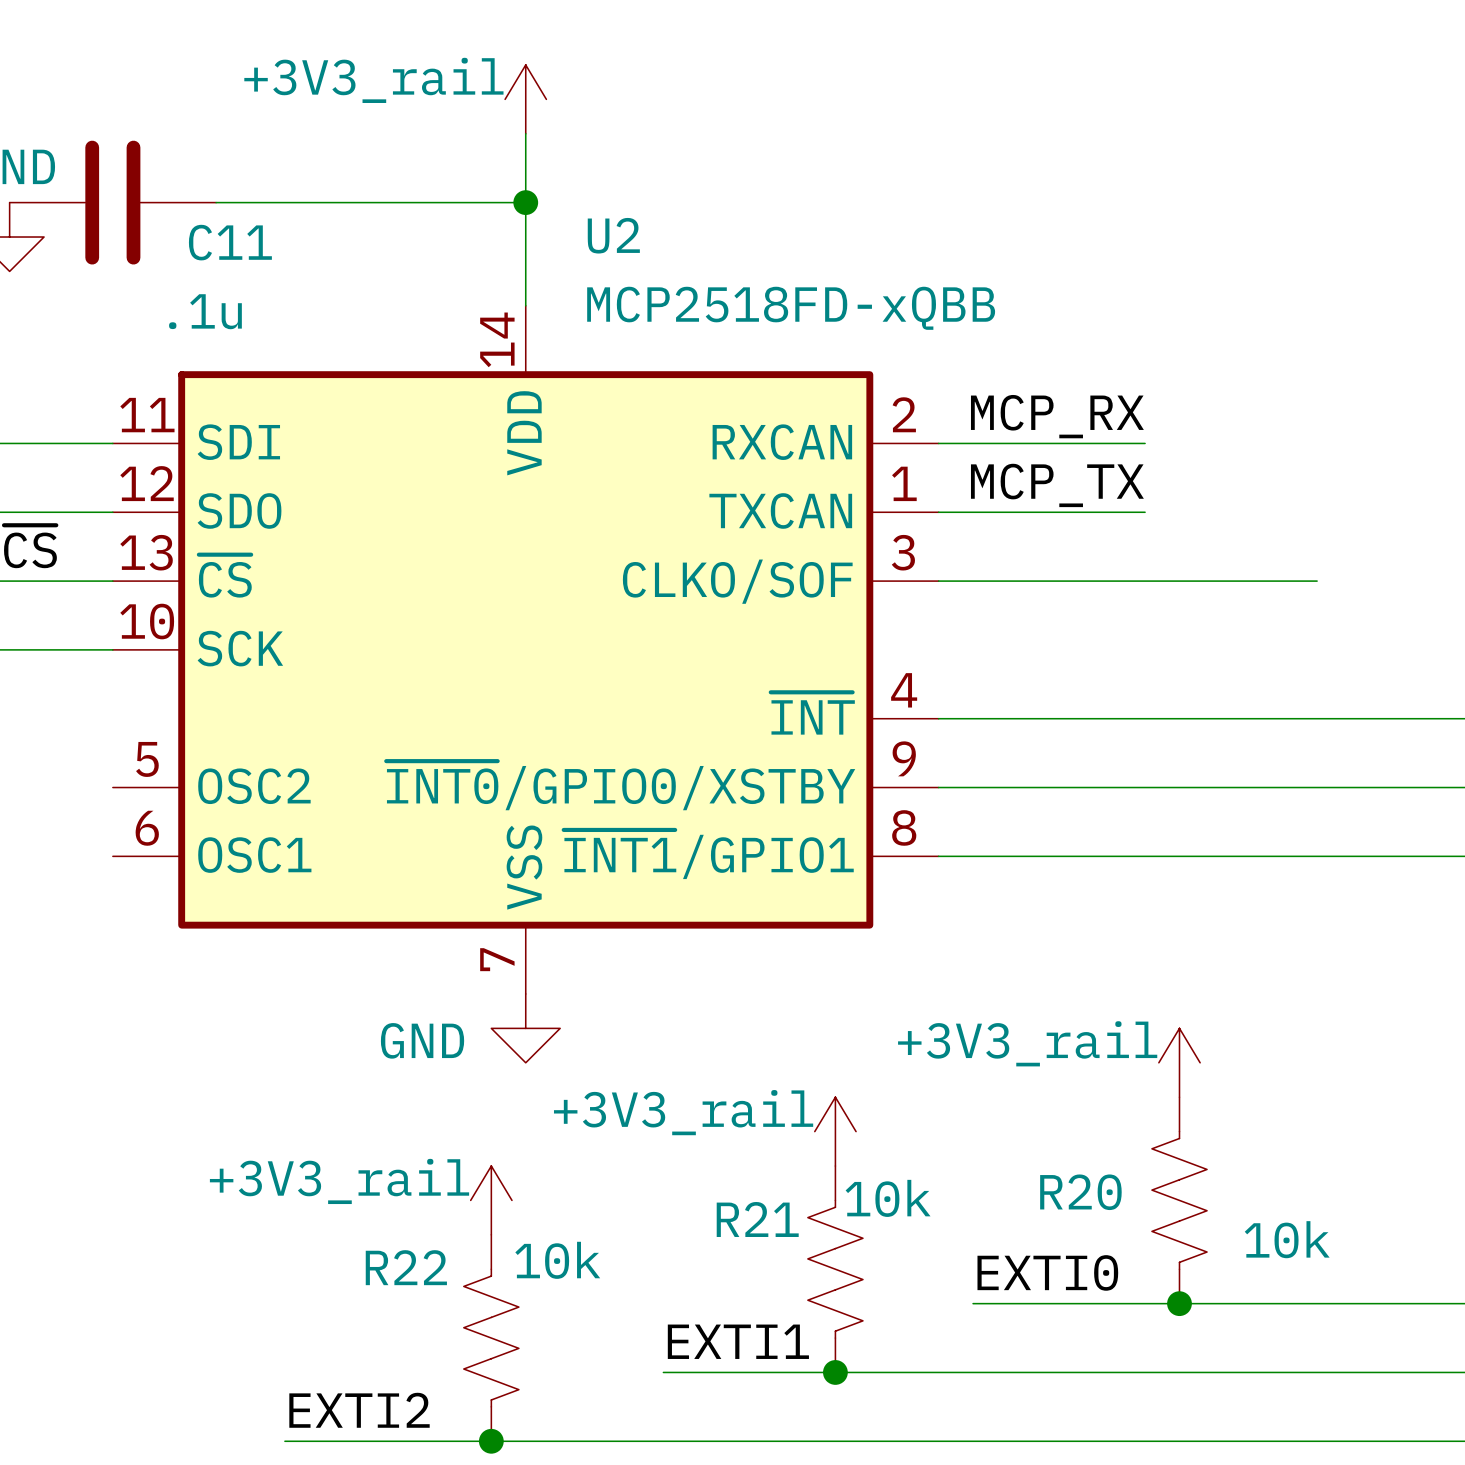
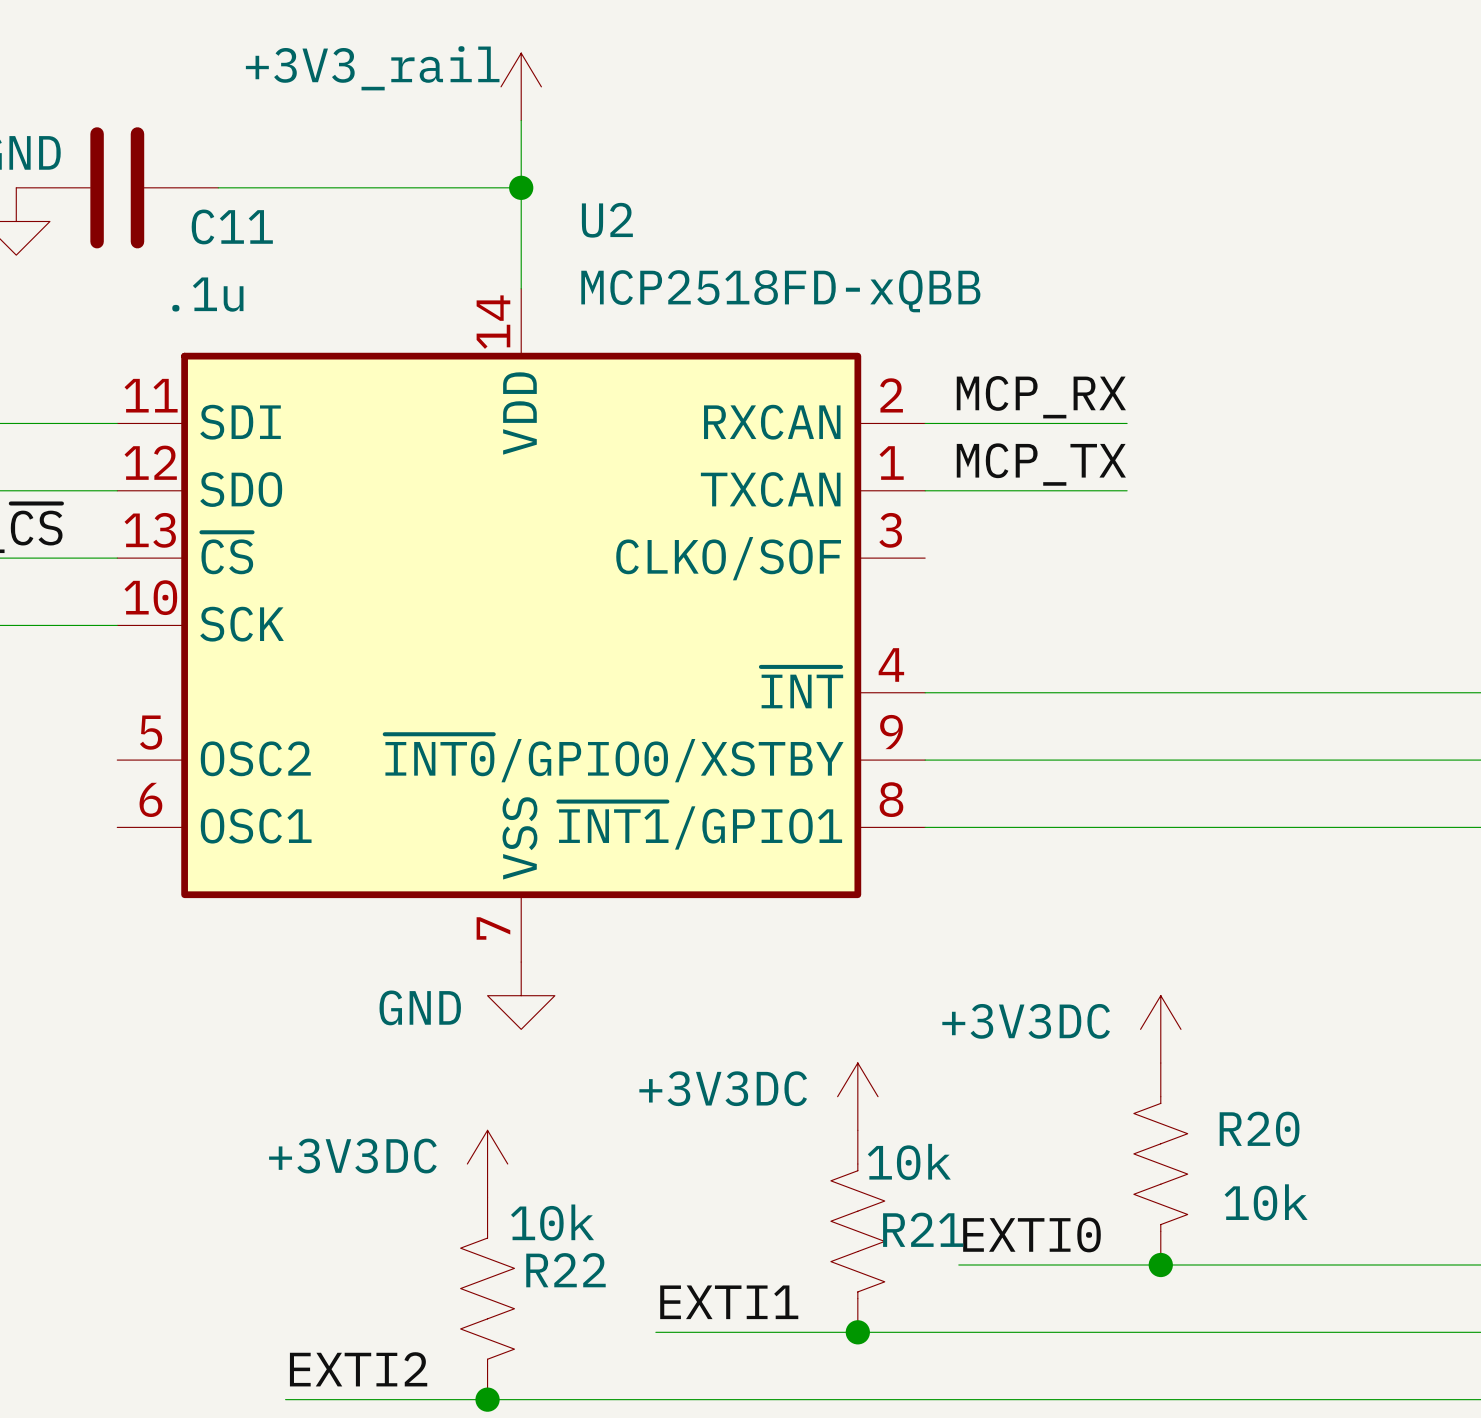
wire: (938, 581) (1317, 581) -> none
power symbol: +3V3_rail (1179, 1062) -> +3V3DC (1160, 1029)
power symbol: +3V3_rail (835, 1131) -> none
power symbol: none -> +3V3DC (857, 1096)
R20 name position: R20 (1080, 1192) -> R20 (1259, 1129)
power symbol: +3V3_rail (491, 1200) -> +3V3DC (487, 1164)
R21 name position: R21 (757, 1219) -> R21 (923, 1229)
R22 name position: R22 (406, 1267) -> R22 (565, 1270)
R21 position: (835, 1269) -> (857, 1231)
junction position: (835, 1372) -> (857, 1332)

